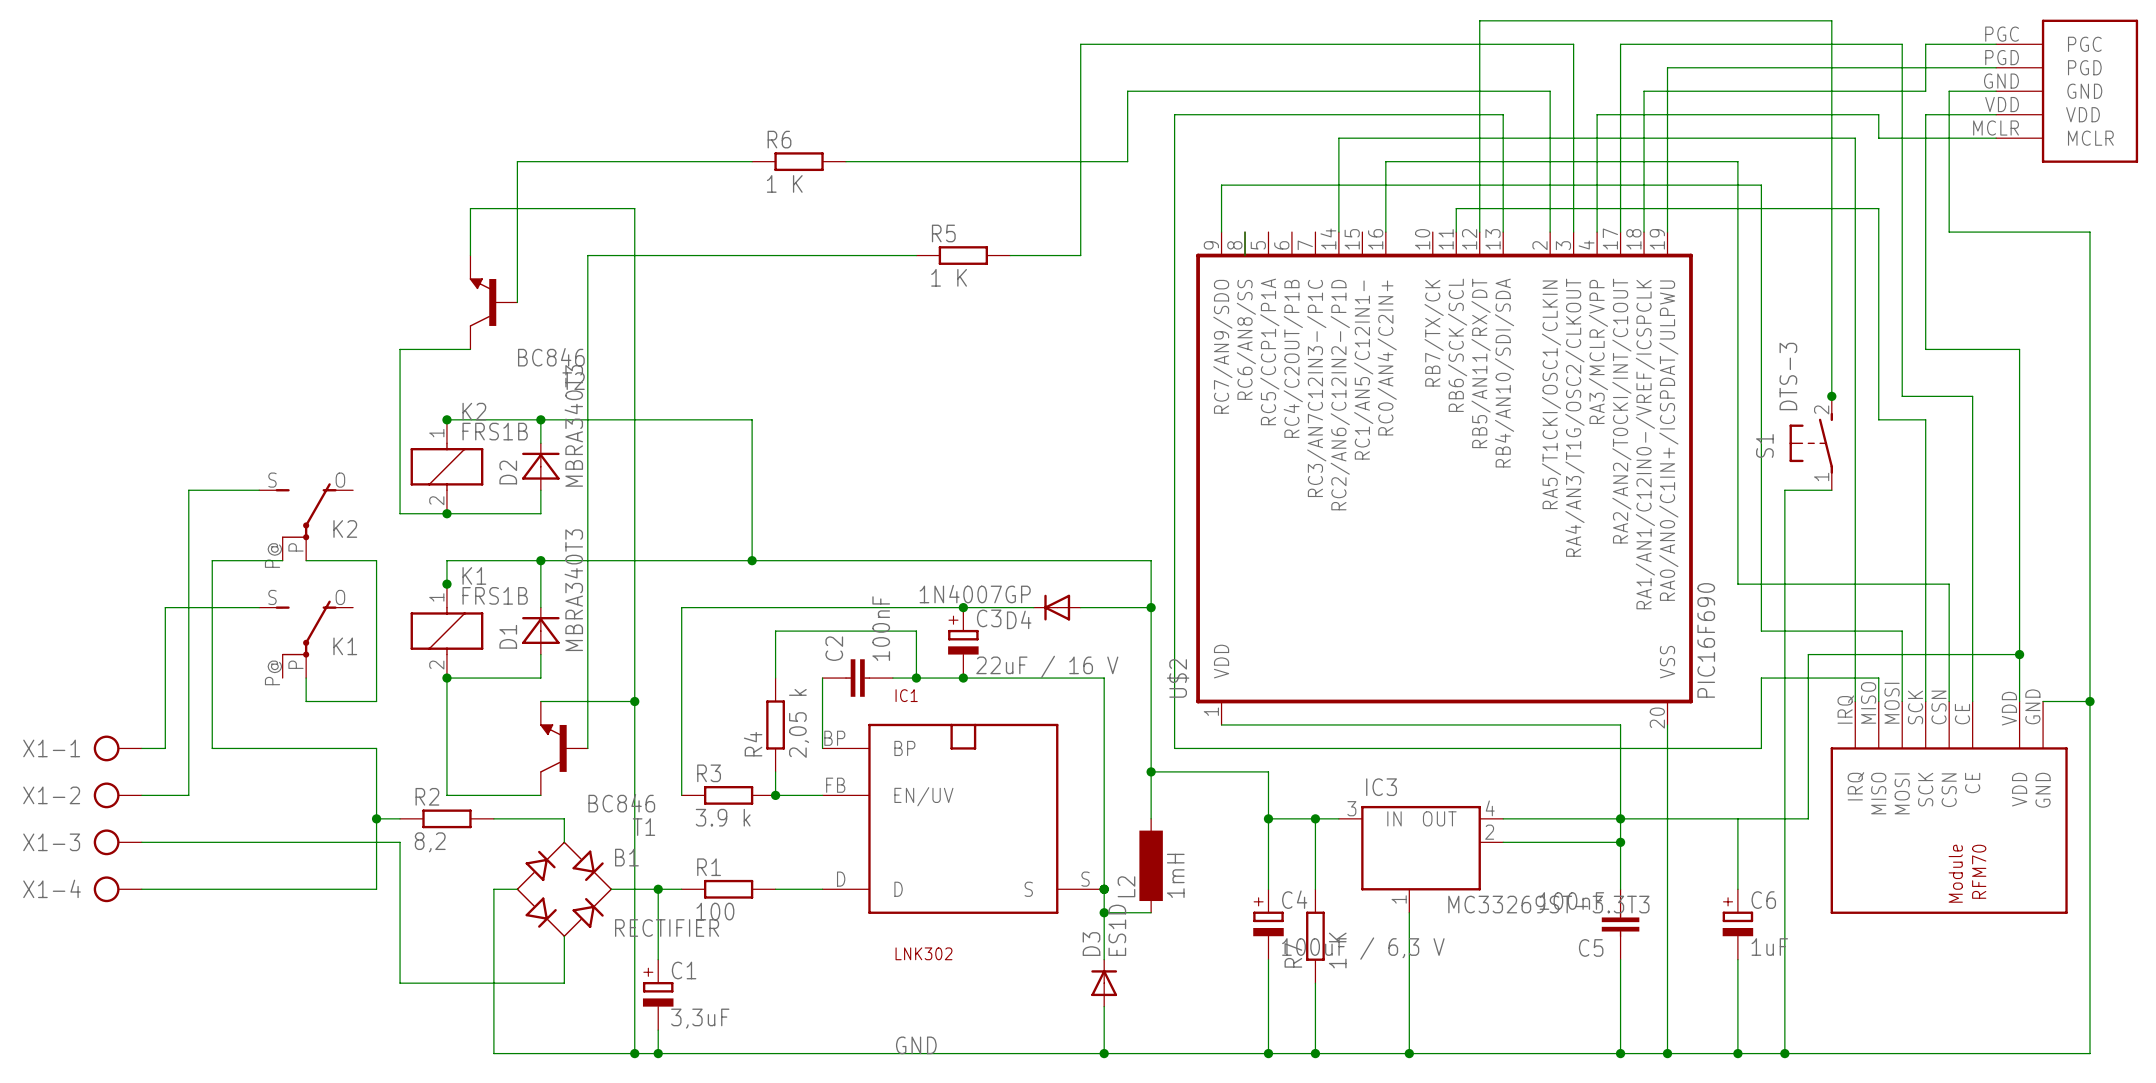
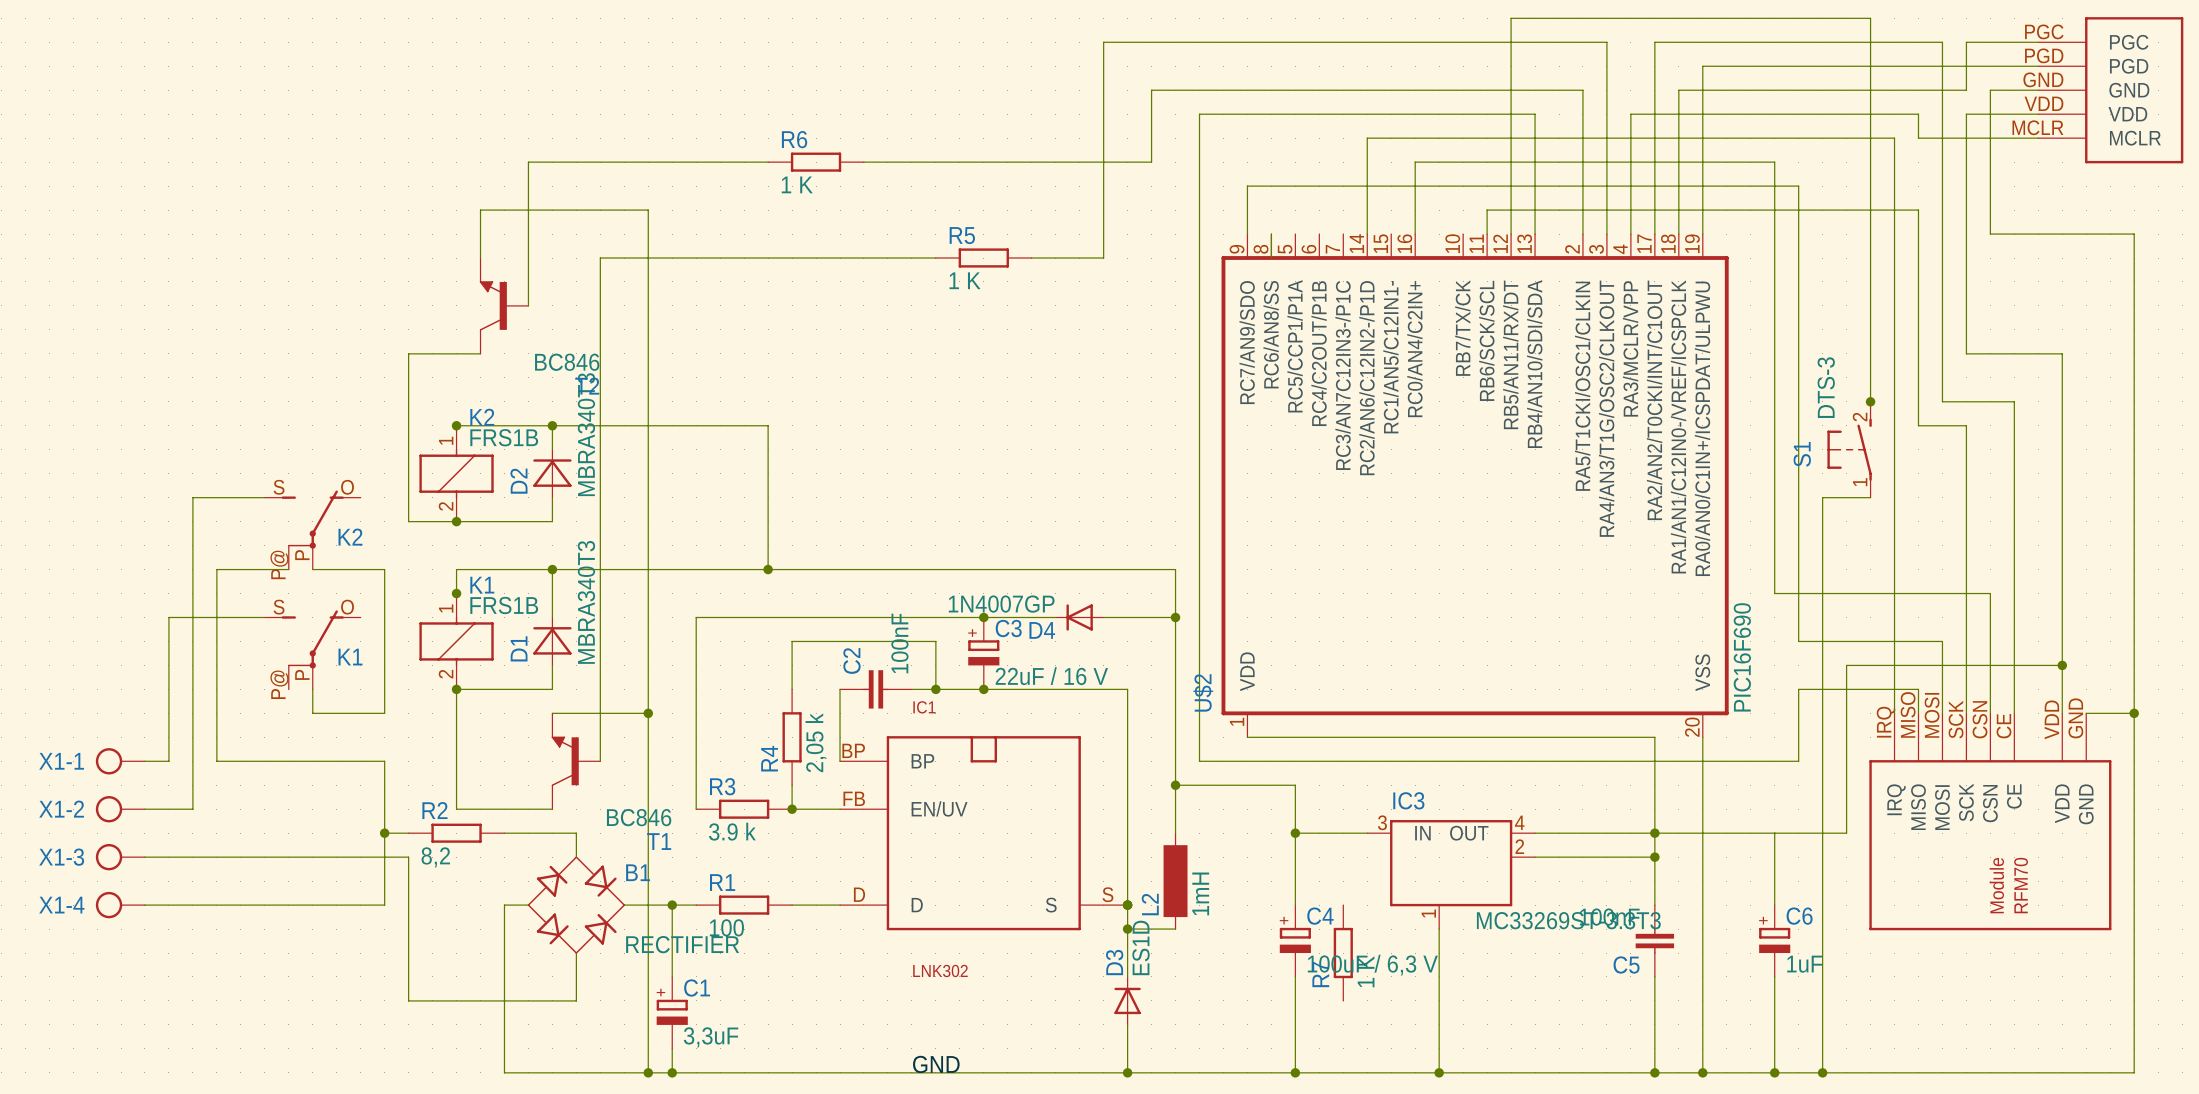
wire: (1315, 818) (1315, 889) -> none
junction: (1315, 818) -> none
wire: (1315, 983) (1315, 1053) -> none
junction: (1315, 1053) -> none

